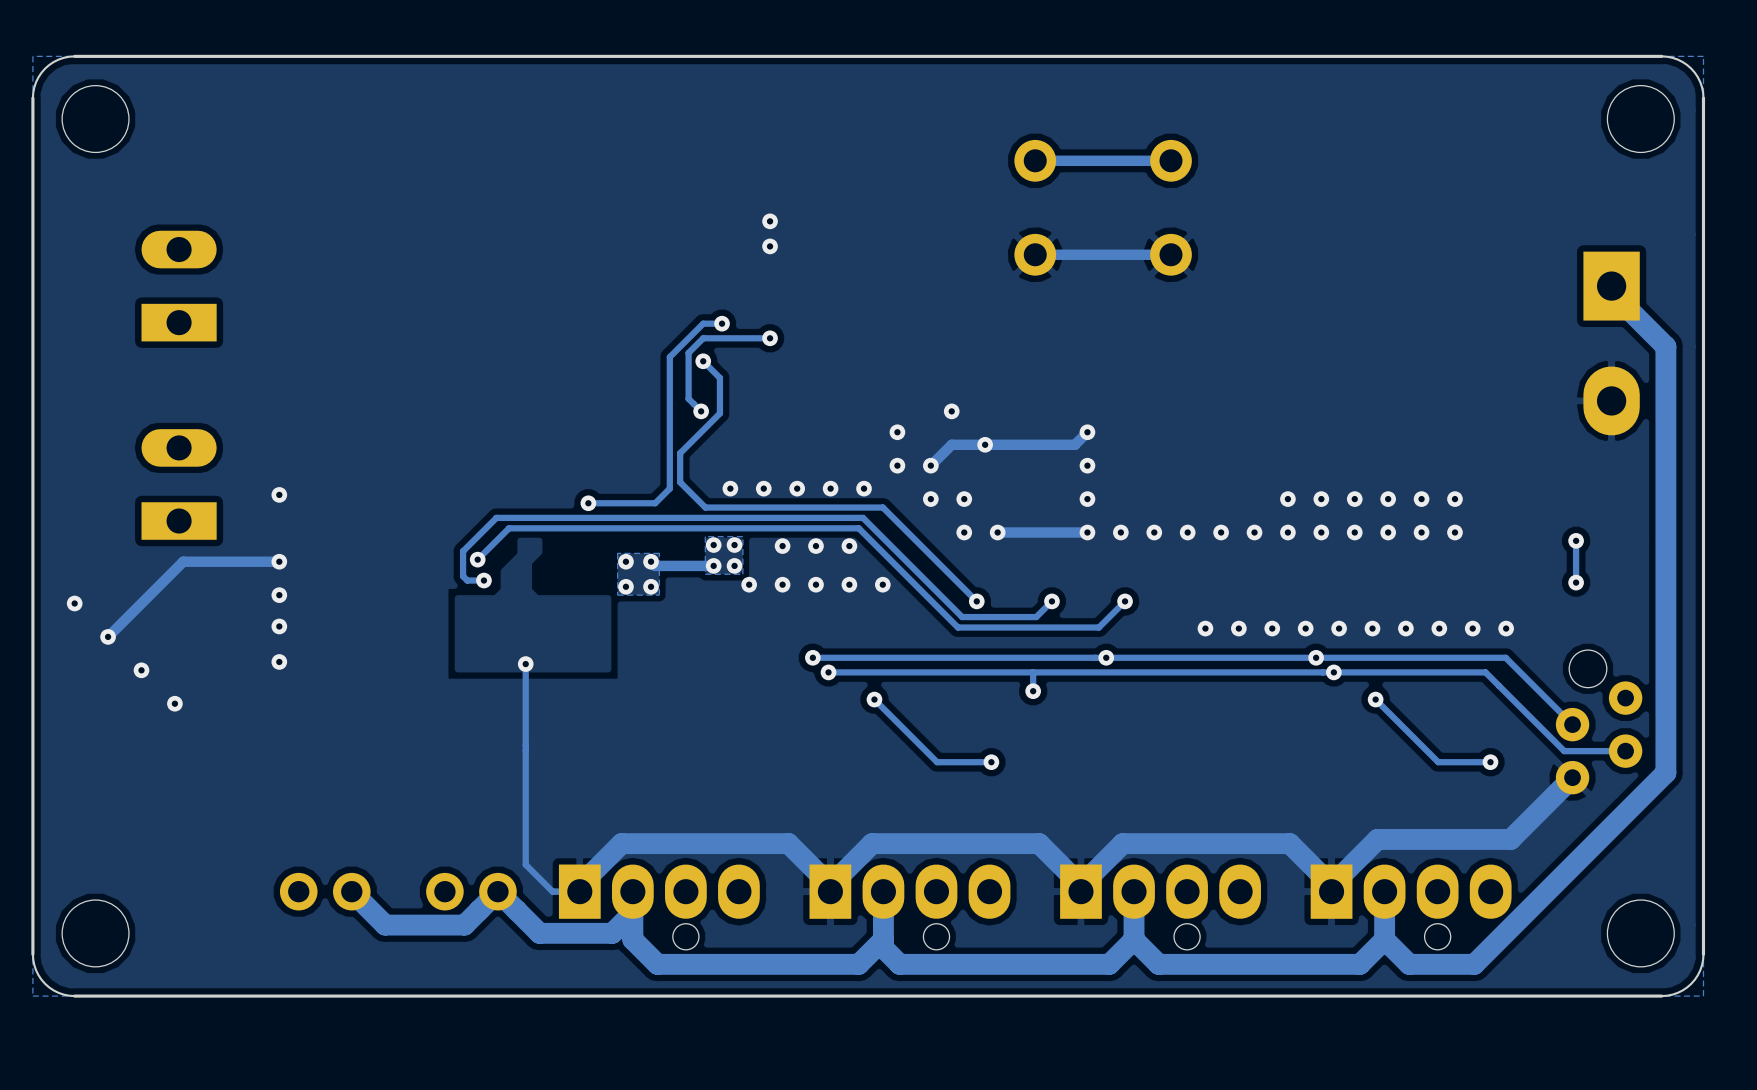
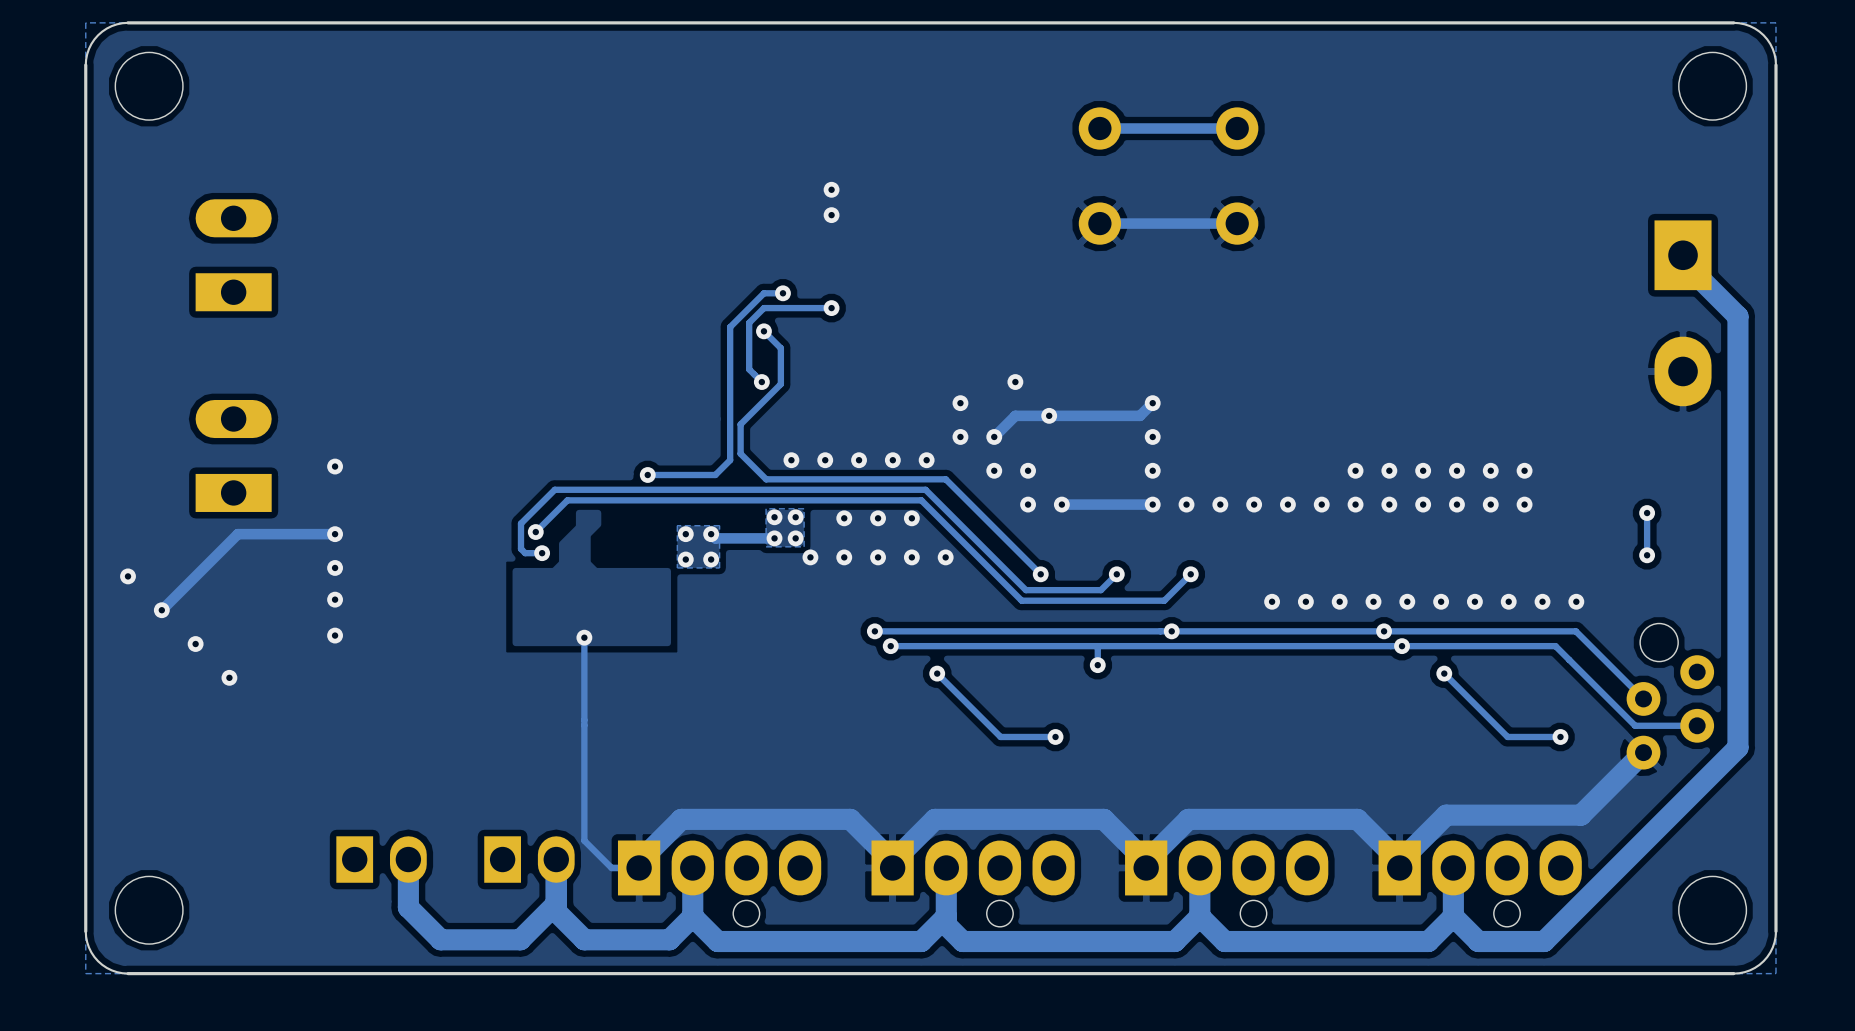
part footprint: [279, 872, 371, 911] -> [336, 836, 427, 883]
part footprint: [426, 872, 517, 911] -> [484, 836, 575, 883]
track: none -> (408, 859) (408, 907) (440, 939) (520, 939) (556, 903)
track: none -> (556, 859) (556, 911) (584, 939) (669, 939) (692, 916)
track: (351, 891) (385, 925) (464, 925) (497, 891) (539, 933) (612, 933) (632, 912) -> none

